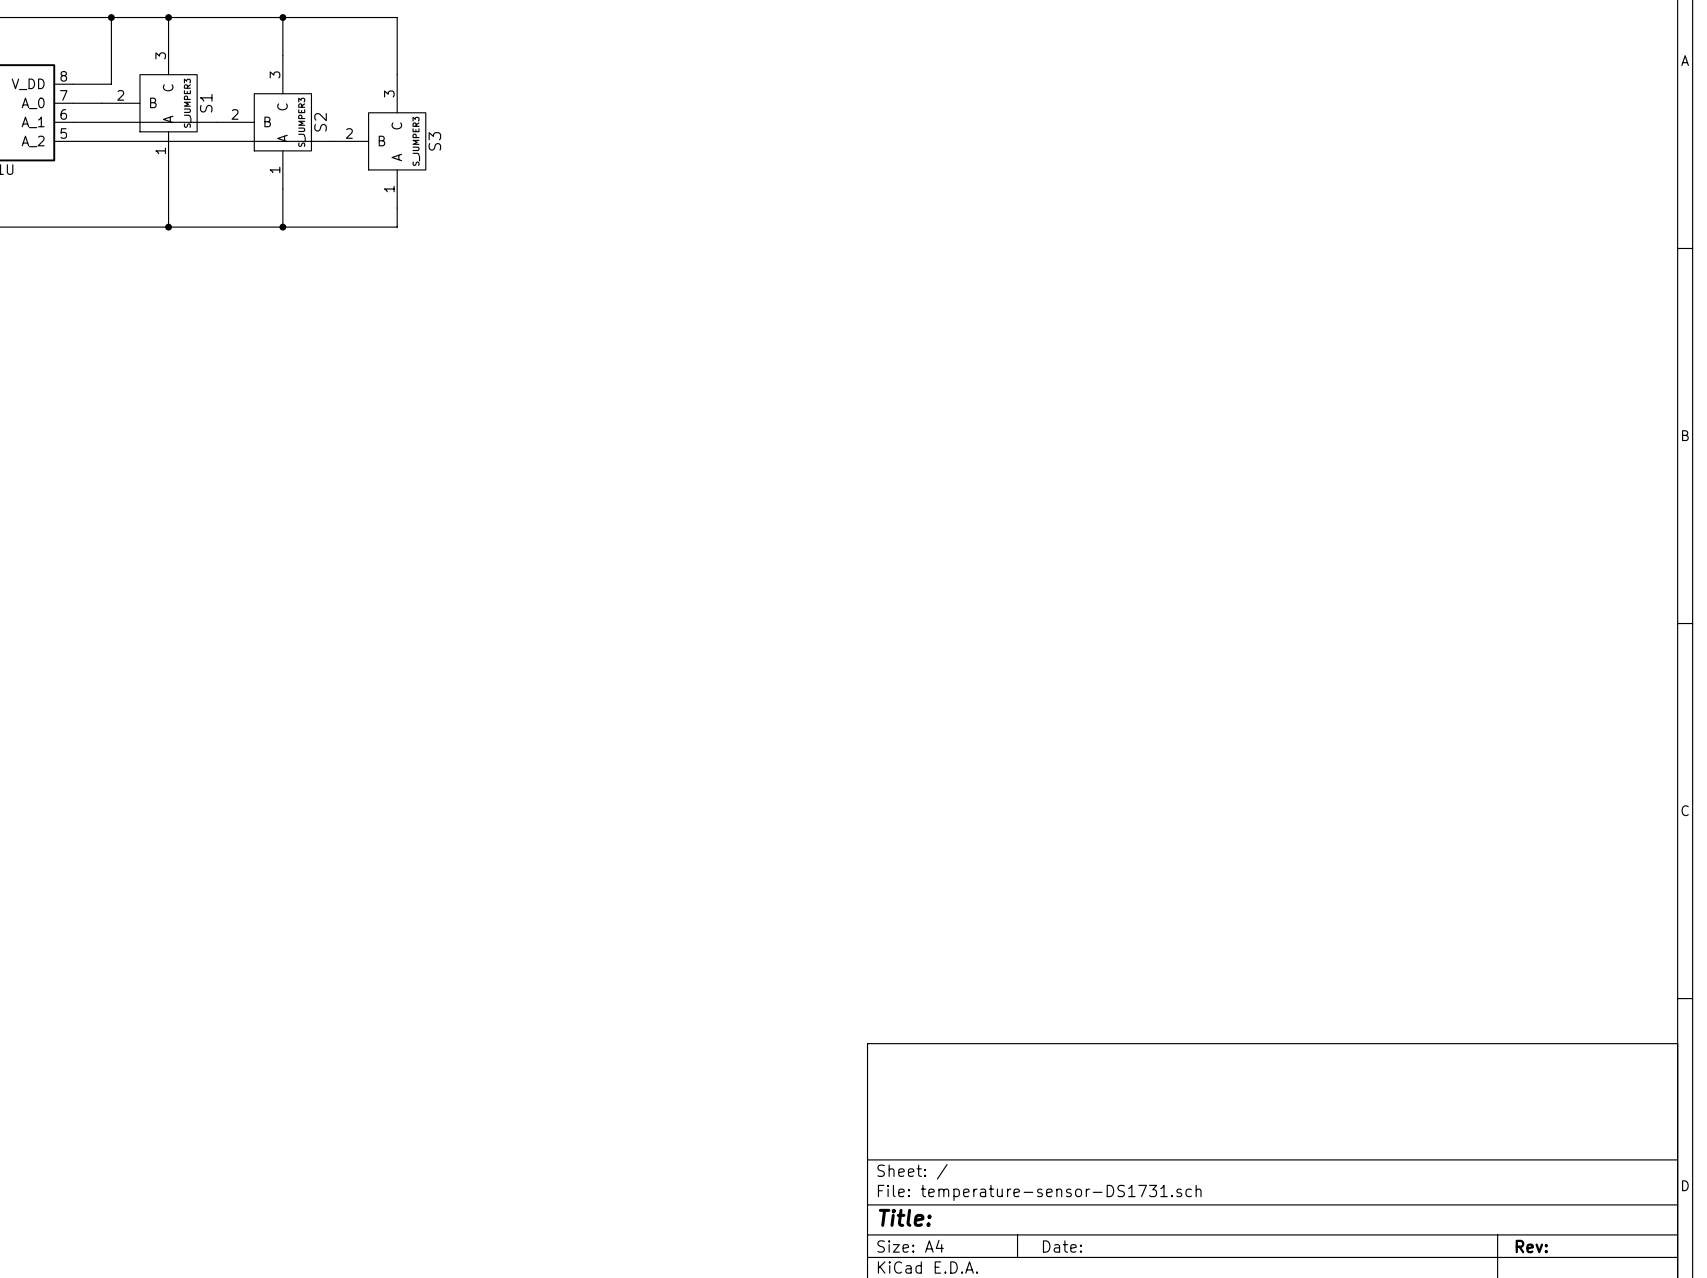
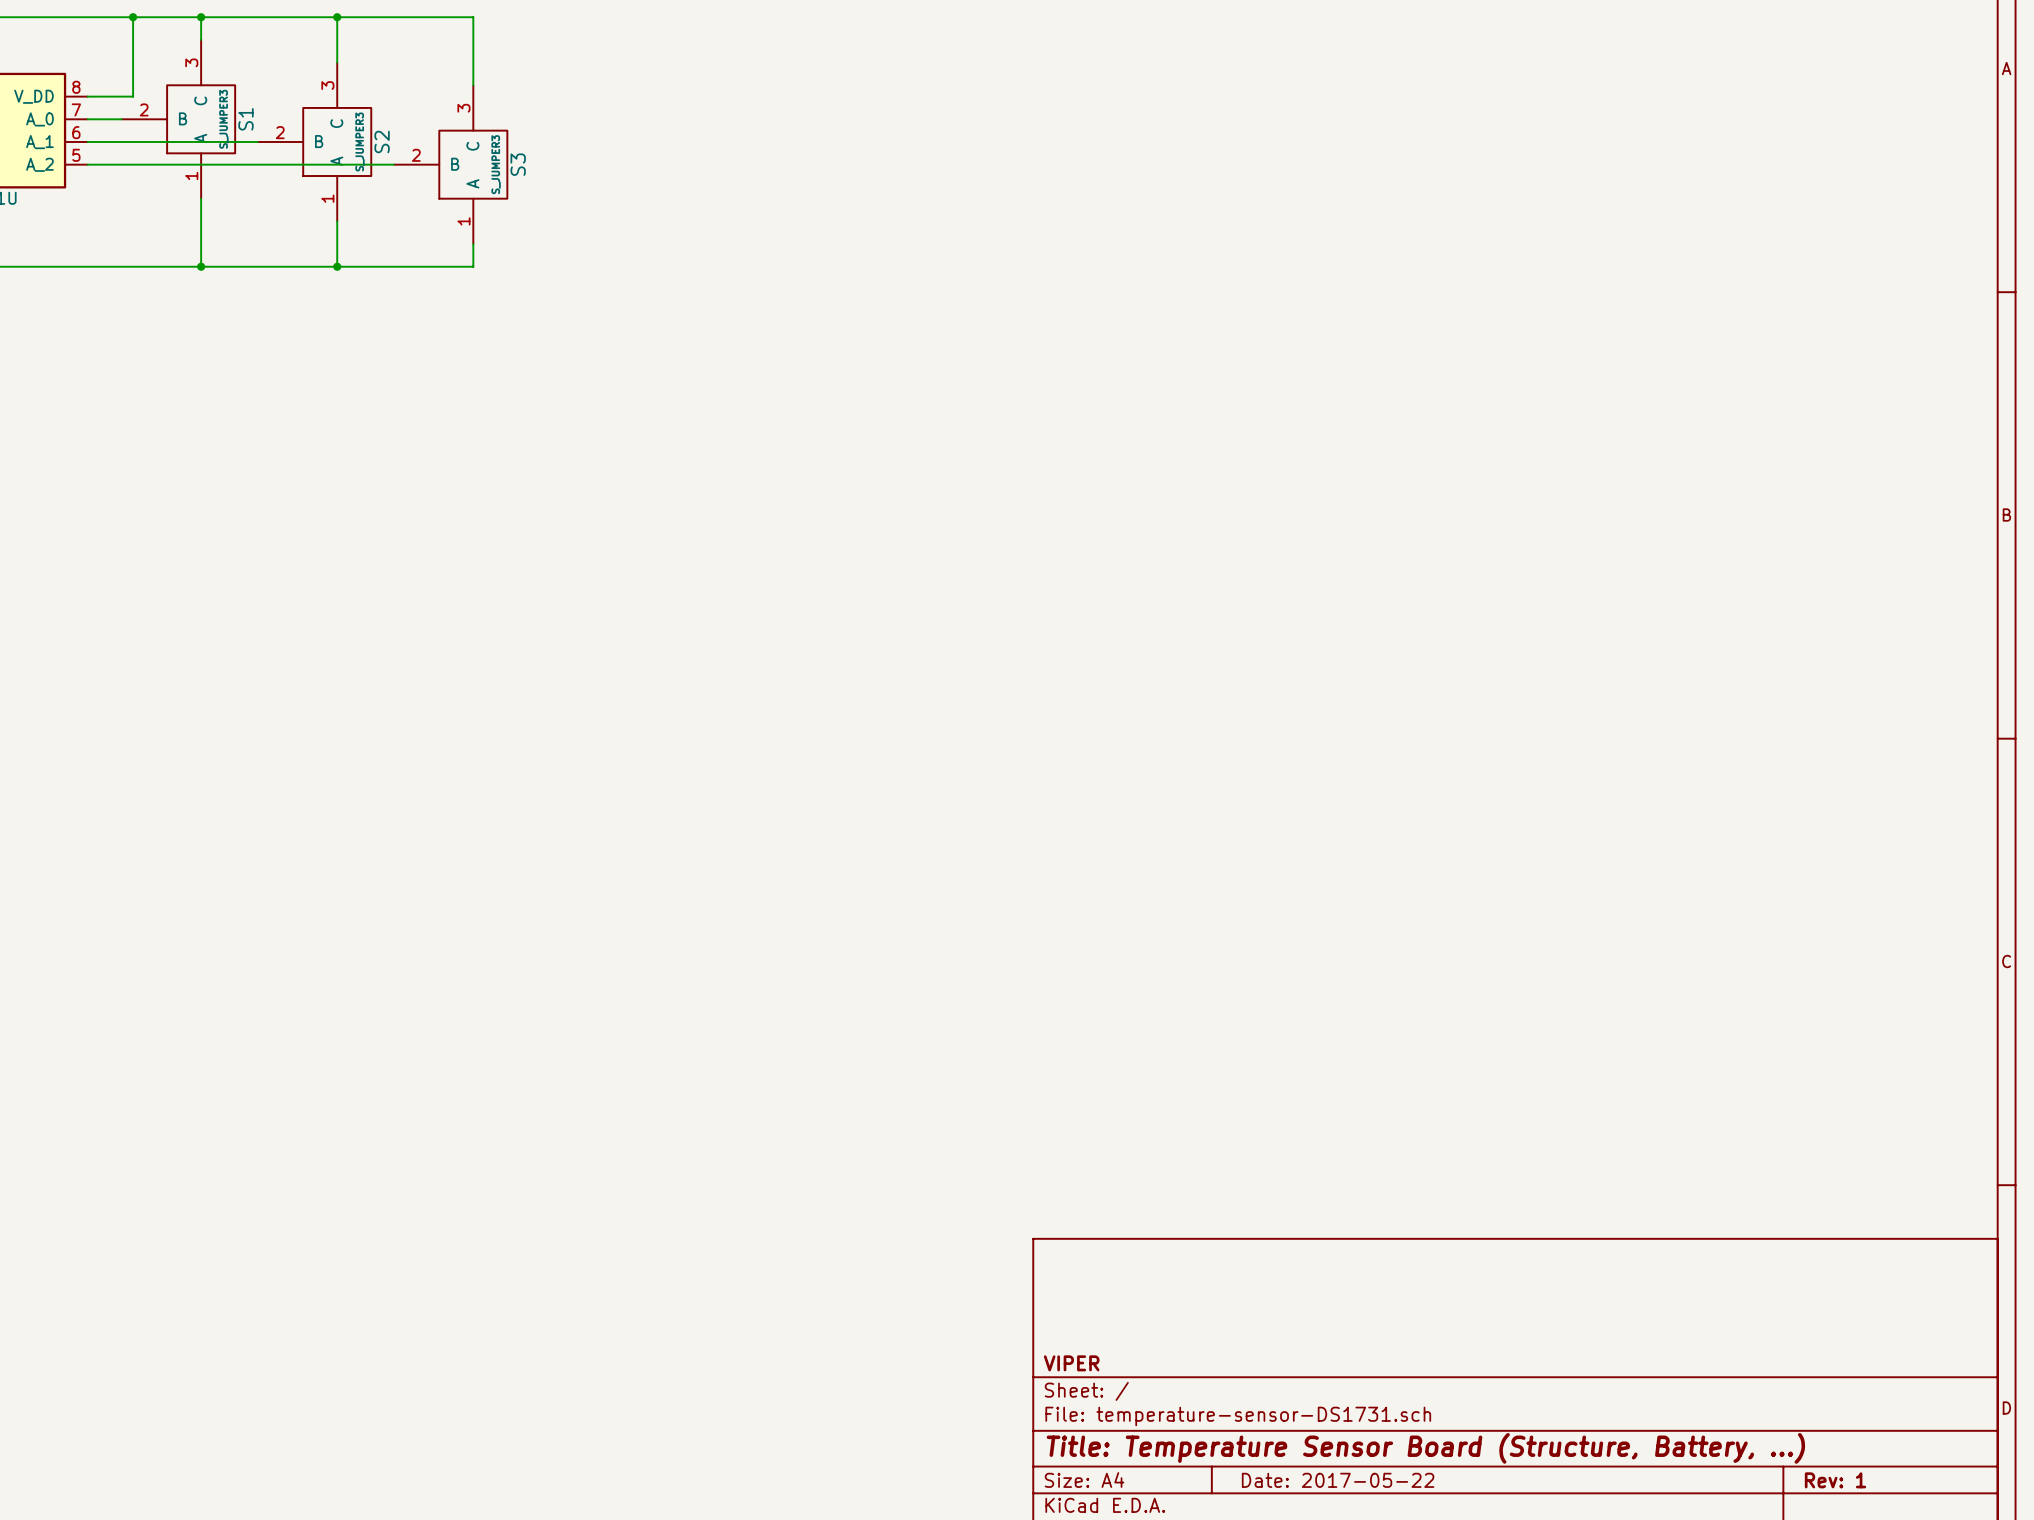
title block: none -> VIPER (1071, 1363)
title block: Title: (905, 1217) -> Title: Temperature Sensor Board (Structure, Battery, ...) (1425, 1448)
title block: Date: (1062, 1246) -> Date: 2017-05-22 (1338, 1480)
title block: Rev: (1531, 1246) -> Rev: 1 (1835, 1480)

